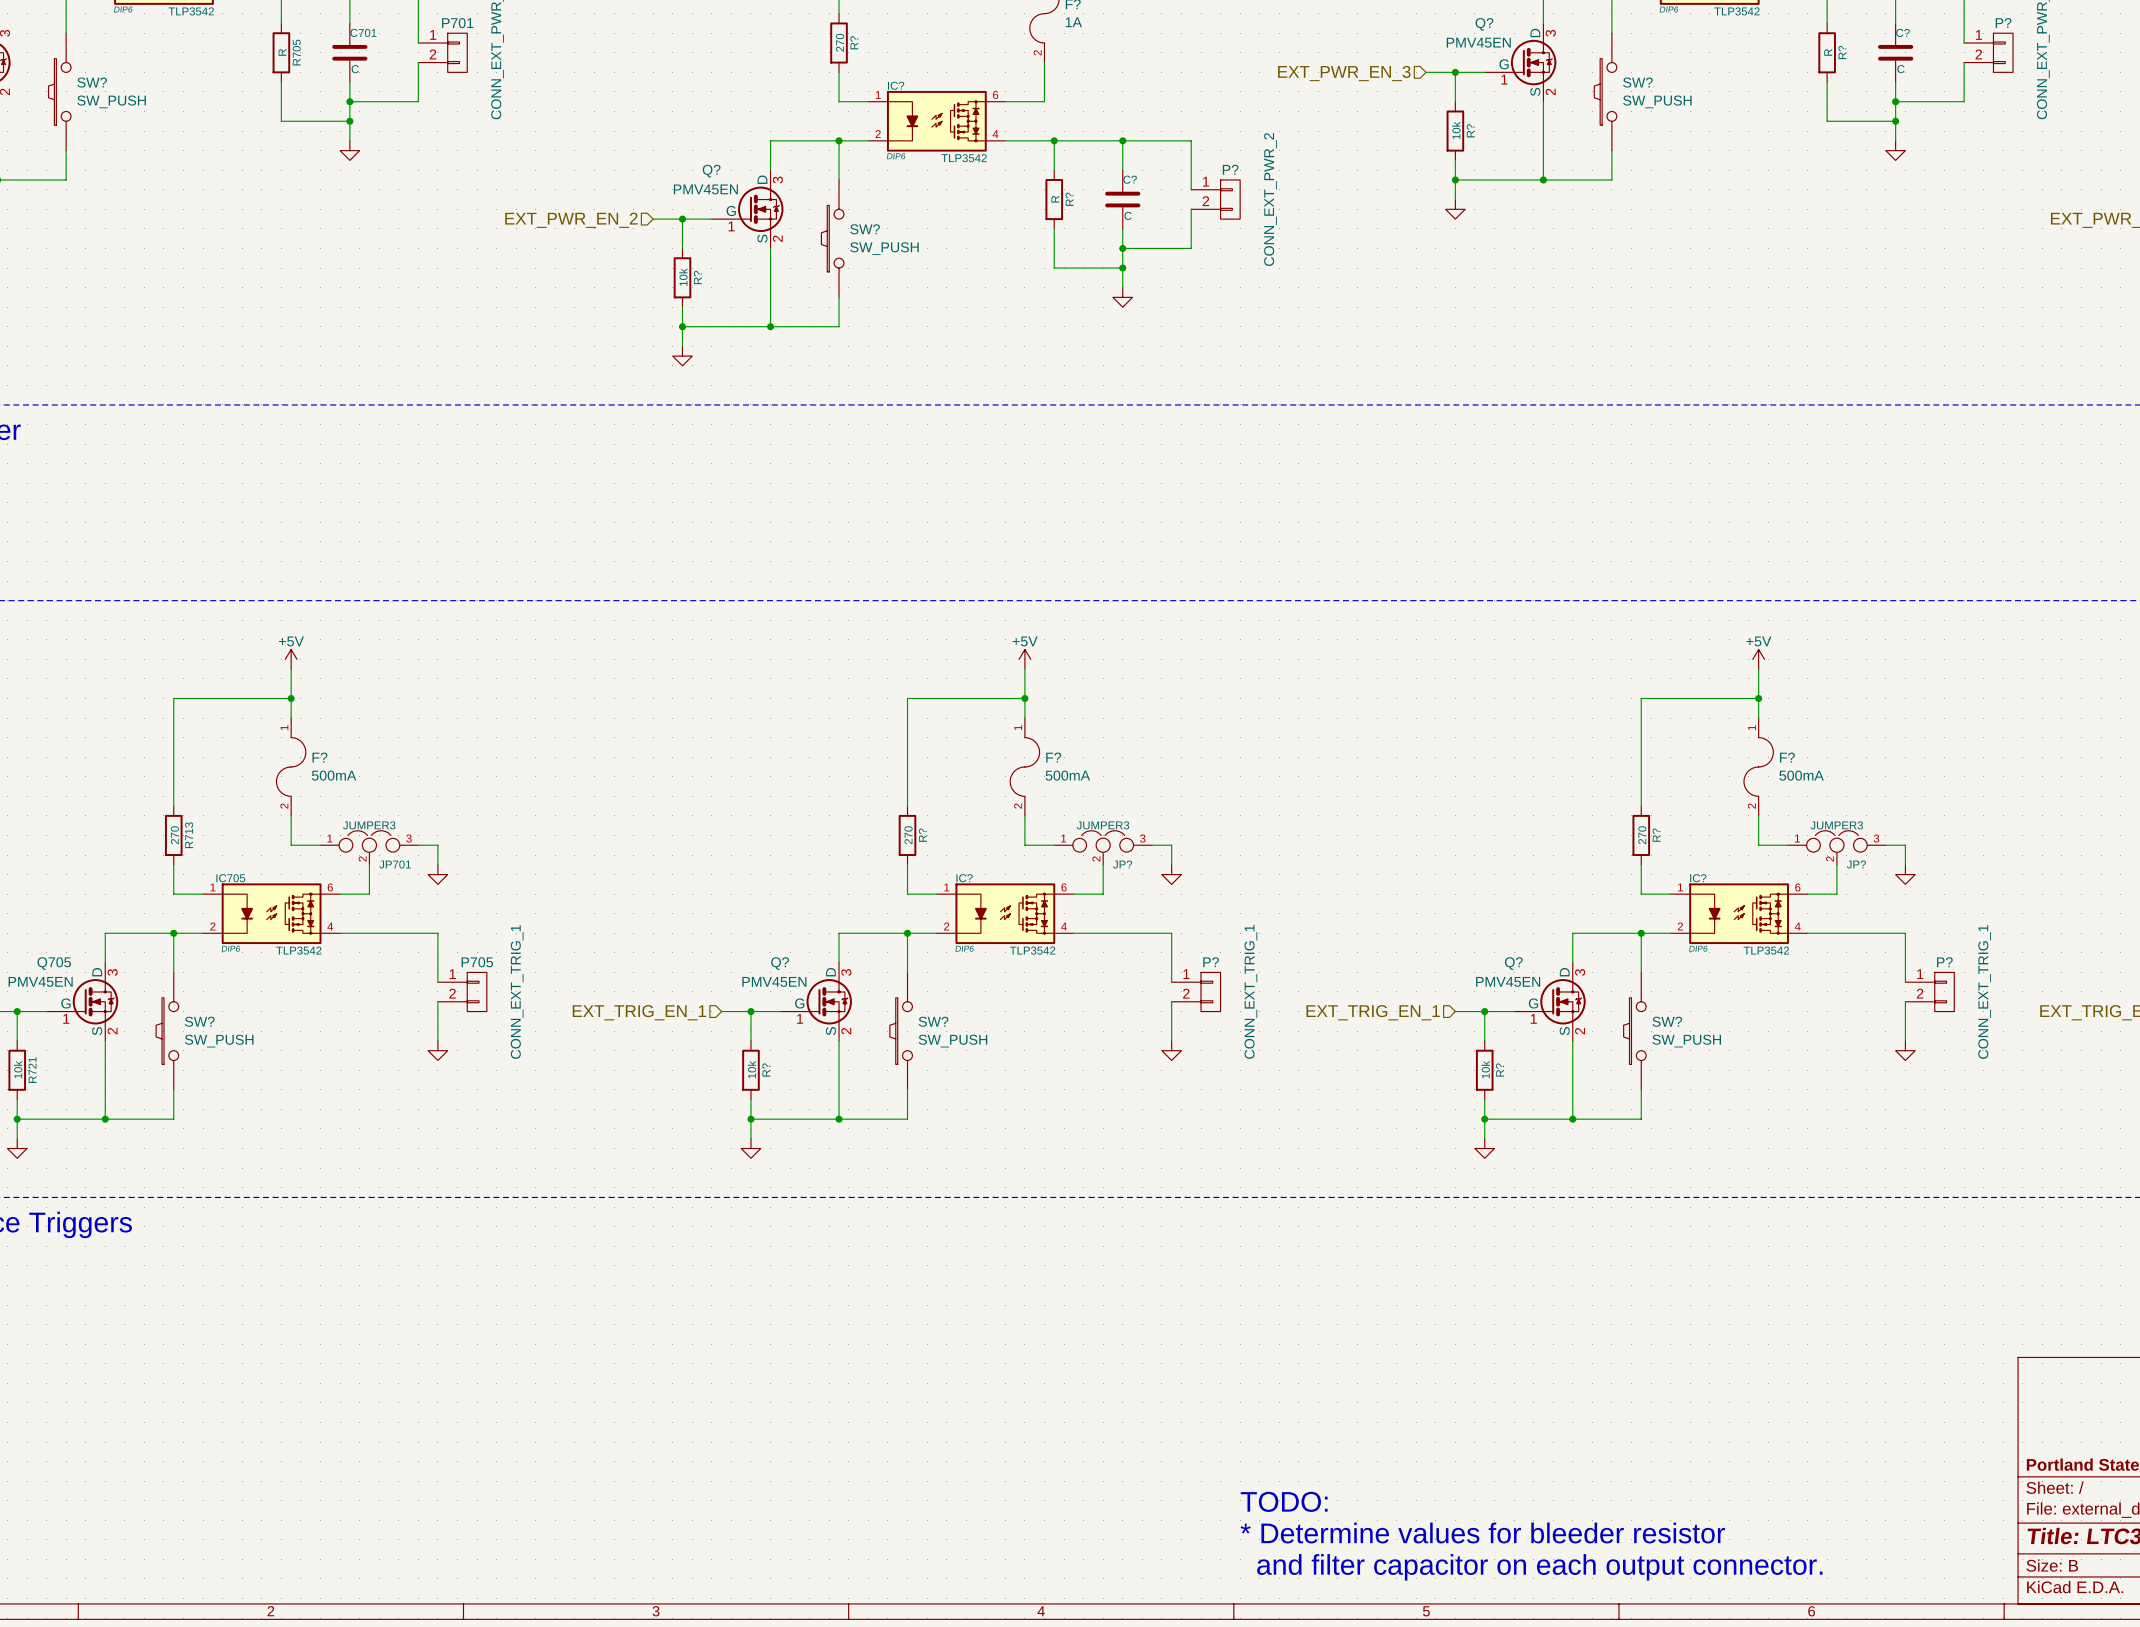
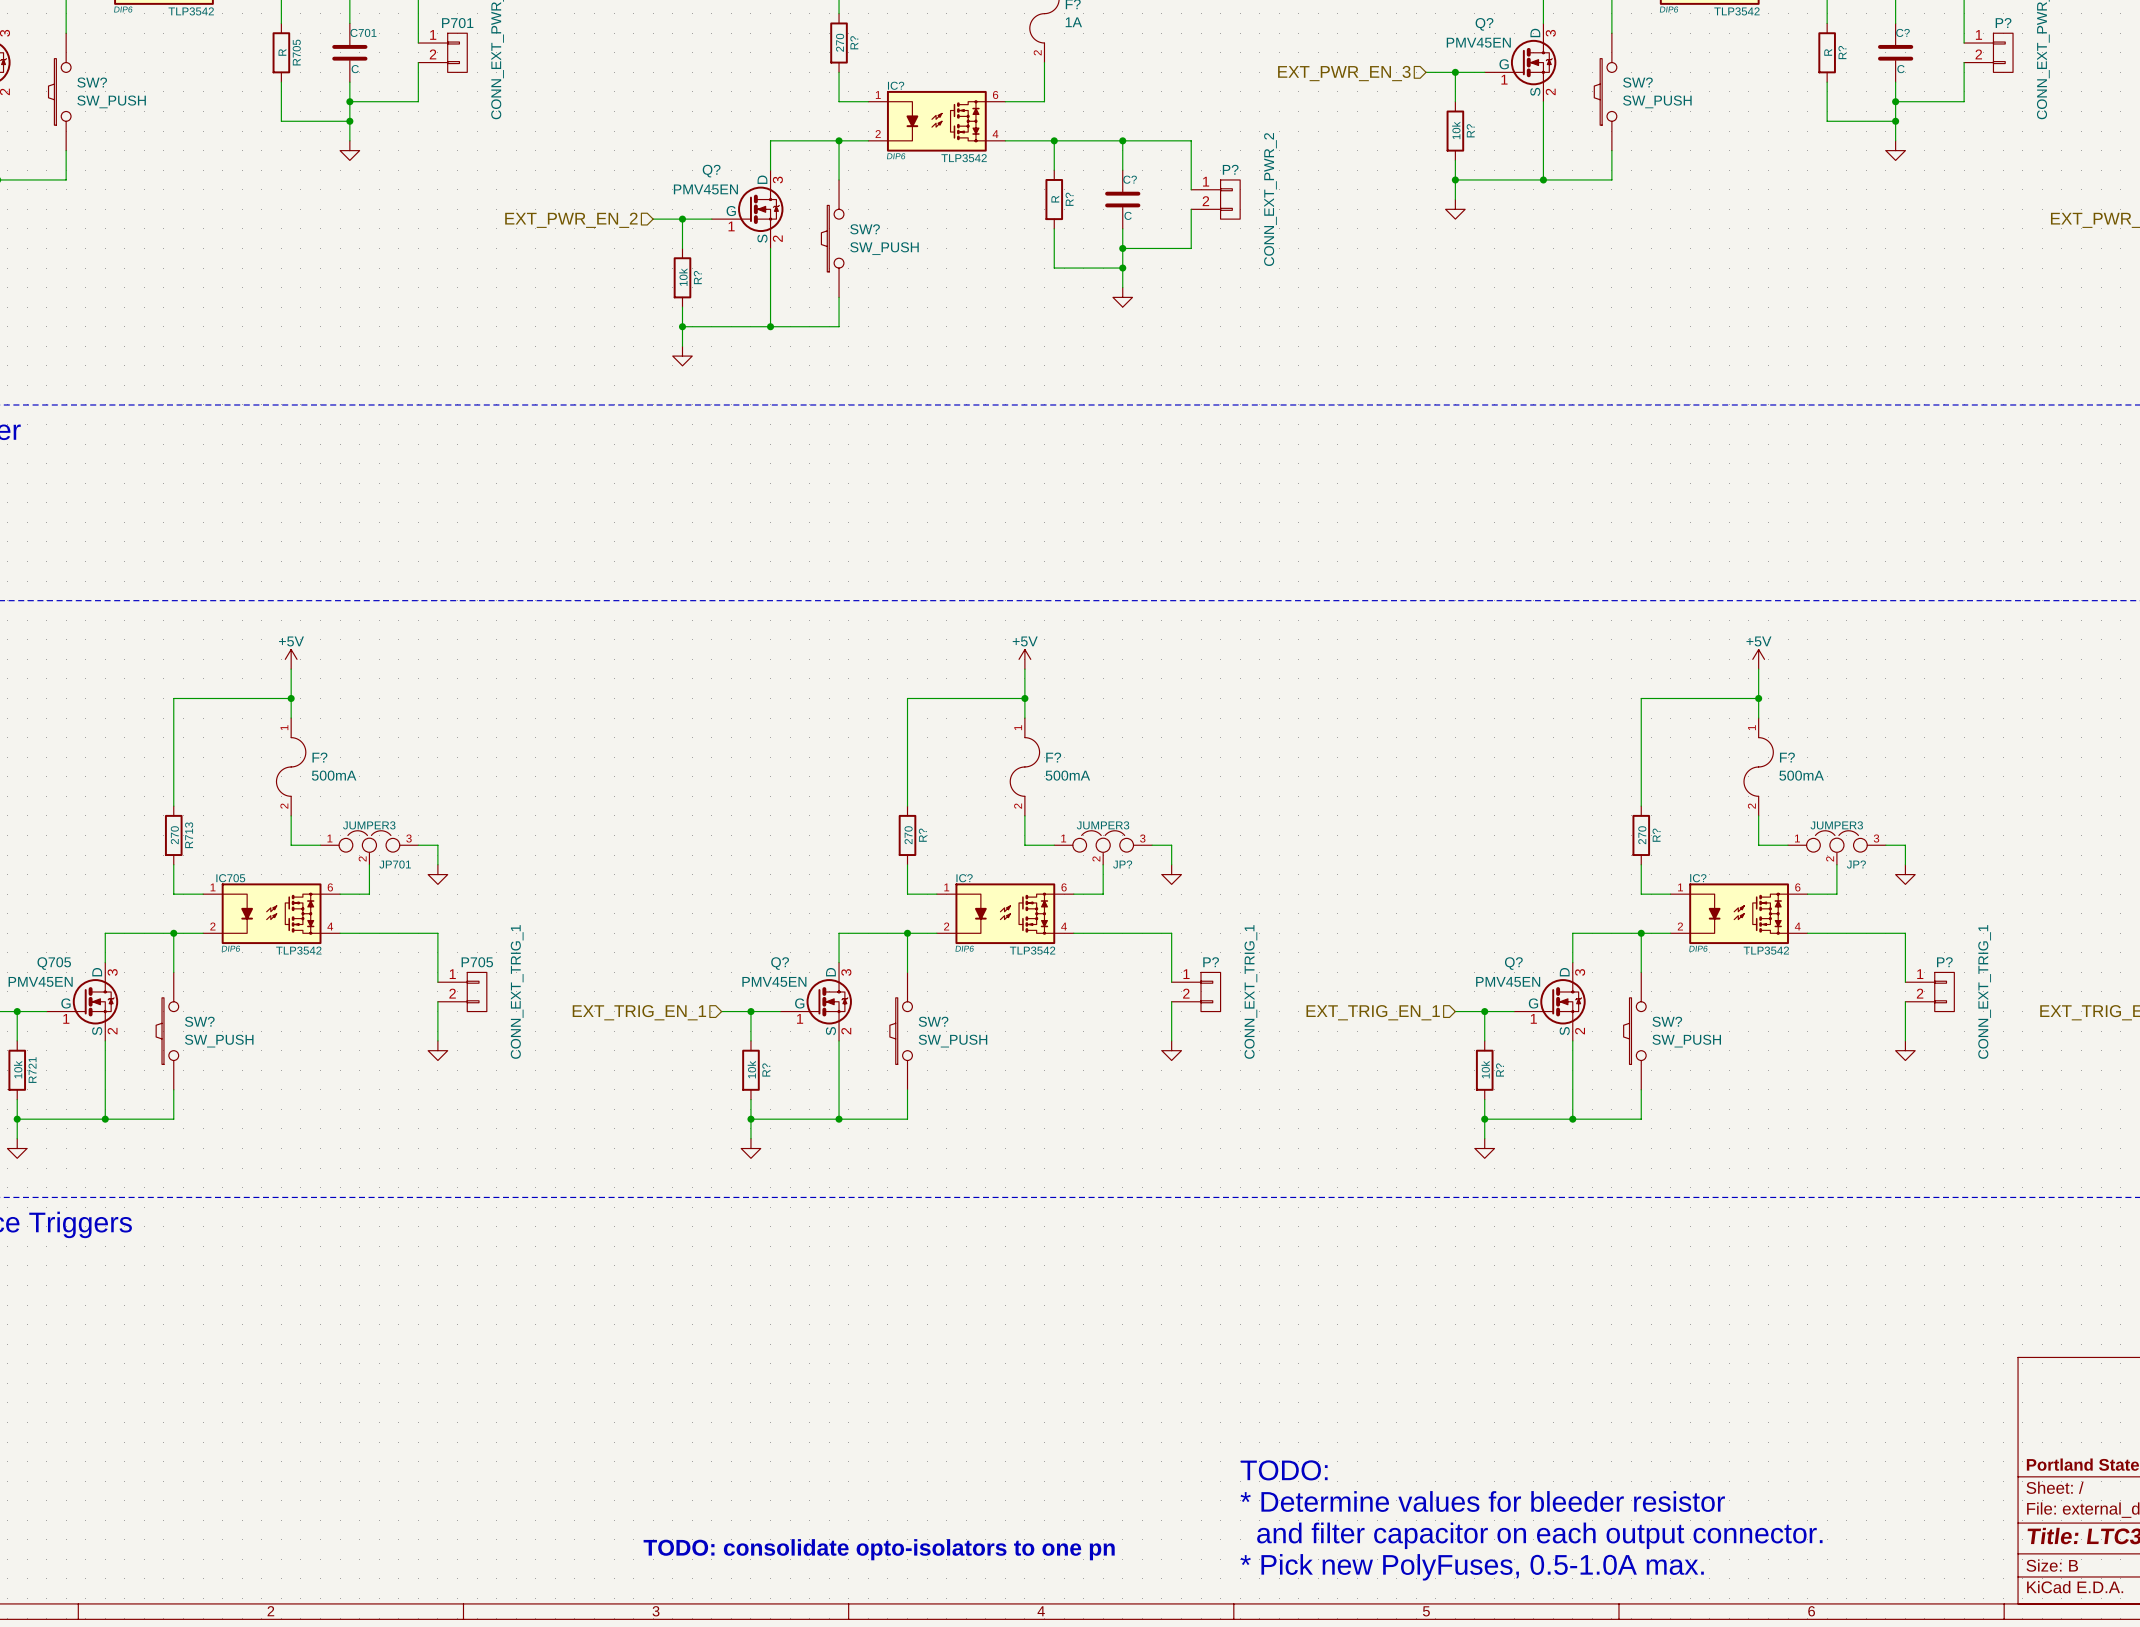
text: none -> TODO: (1284, 1470)
text: TODO: (1284, 1501) -> * Determine values for bleeder resistor (1482, 1501)
text: * Determine values for bleeder resistor (1482, 1533) -> and filter capacitor on each output connector. (1539, 1535)
text: none -> TODO: consolidate opto-isolators to one pn (879, 1549)
text: and filter capacitor on each output connector. (1539, 1567) -> * Pick new PolyFuses, 0.5-1.0A max. (1472, 1567)

